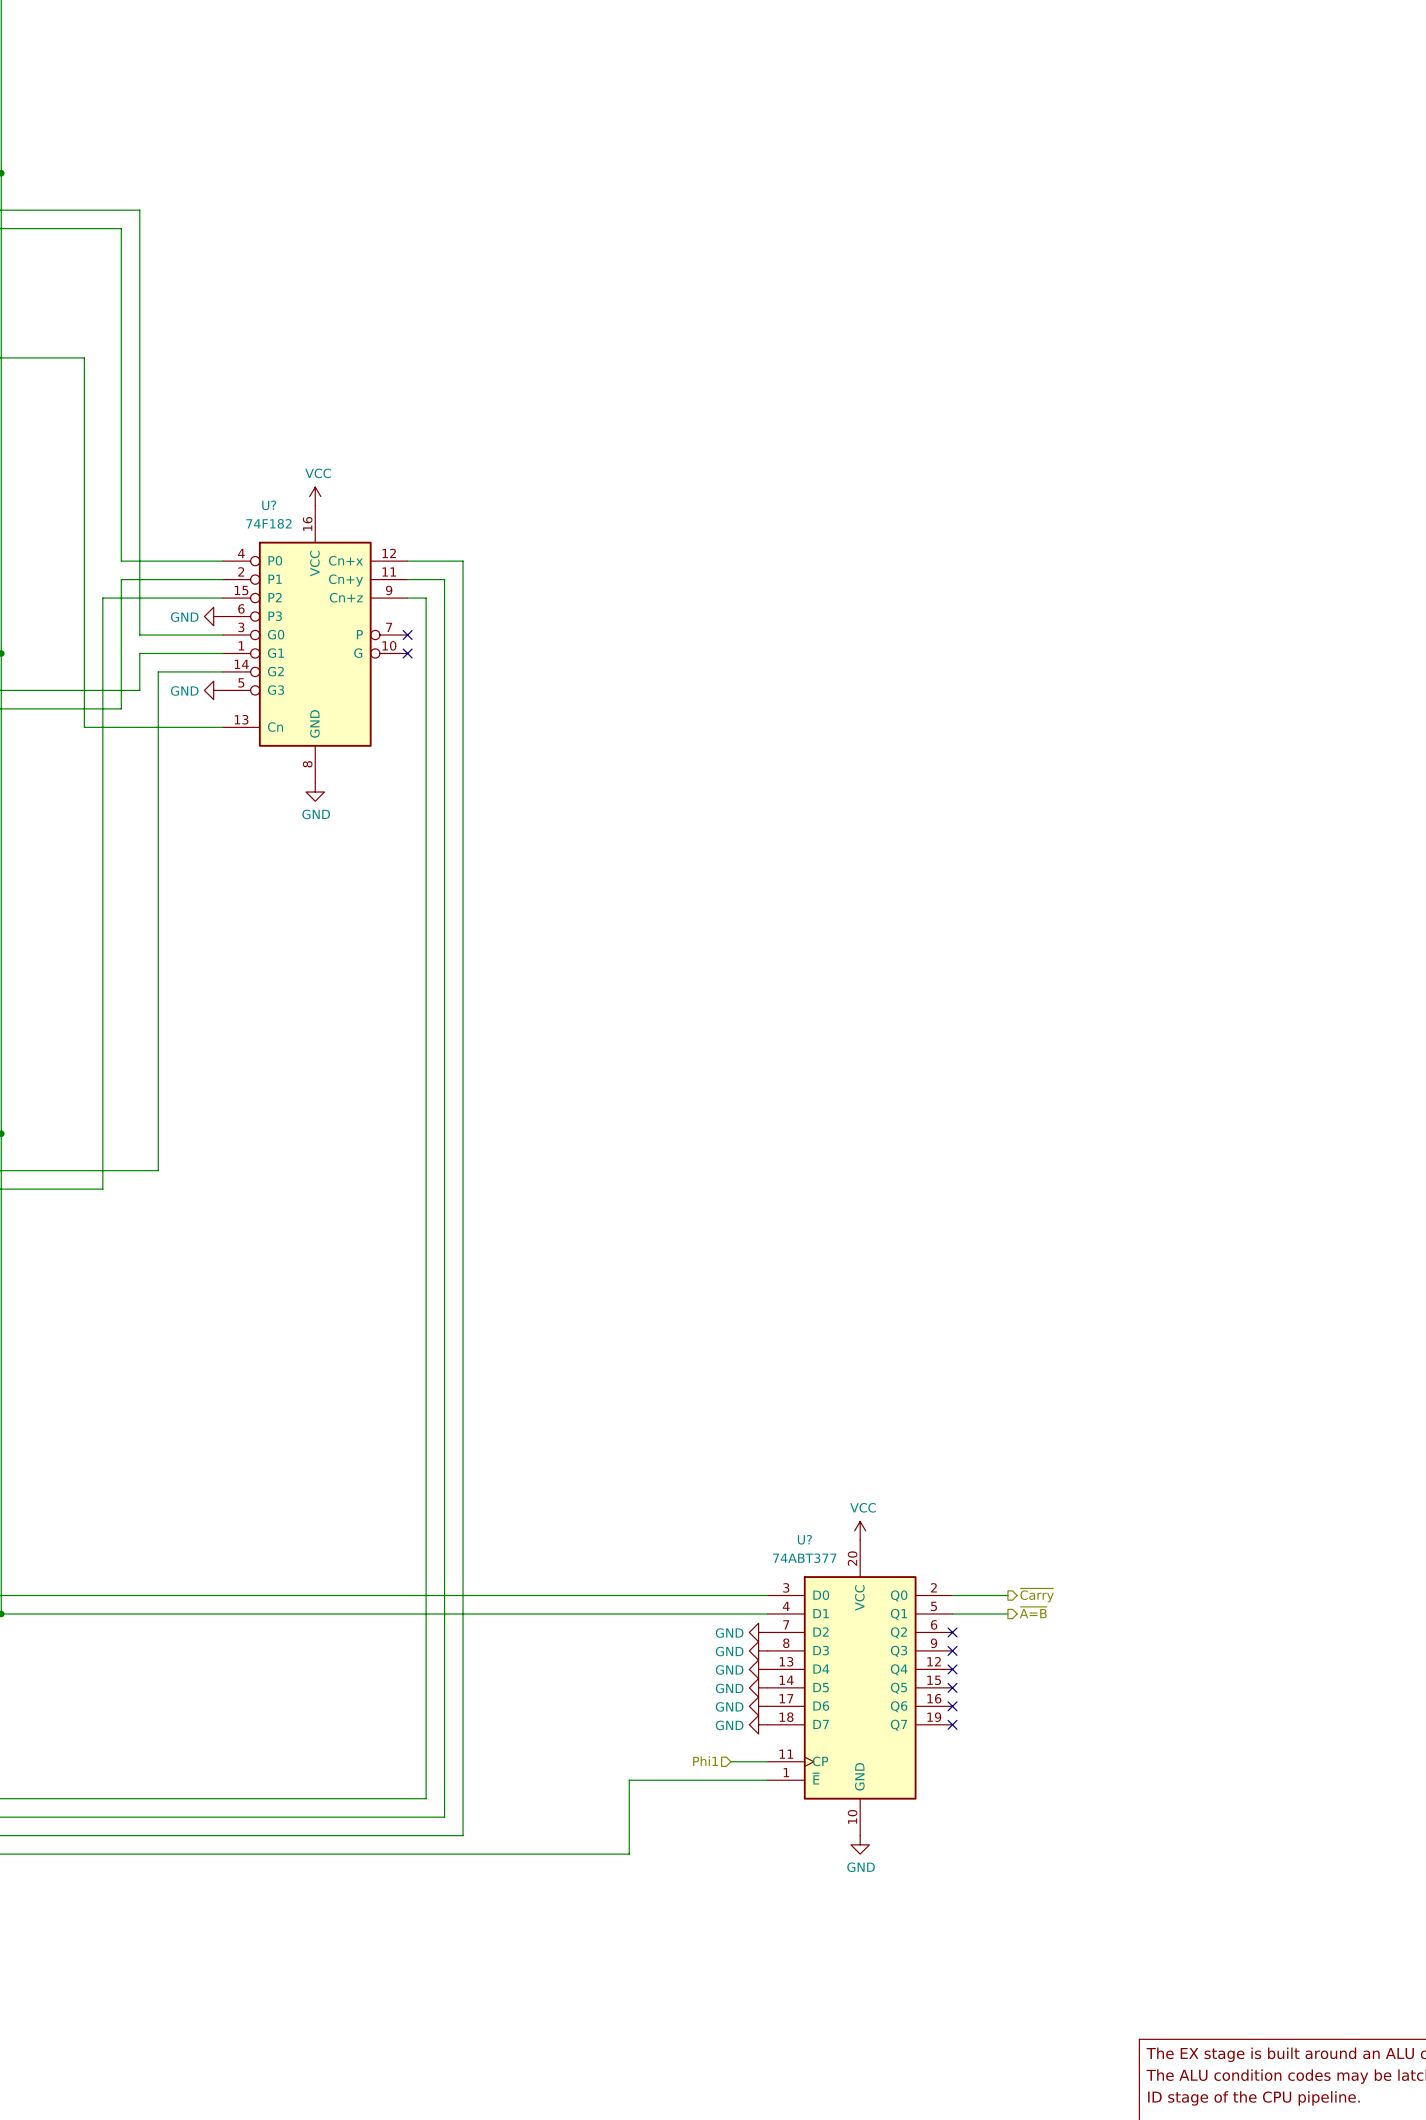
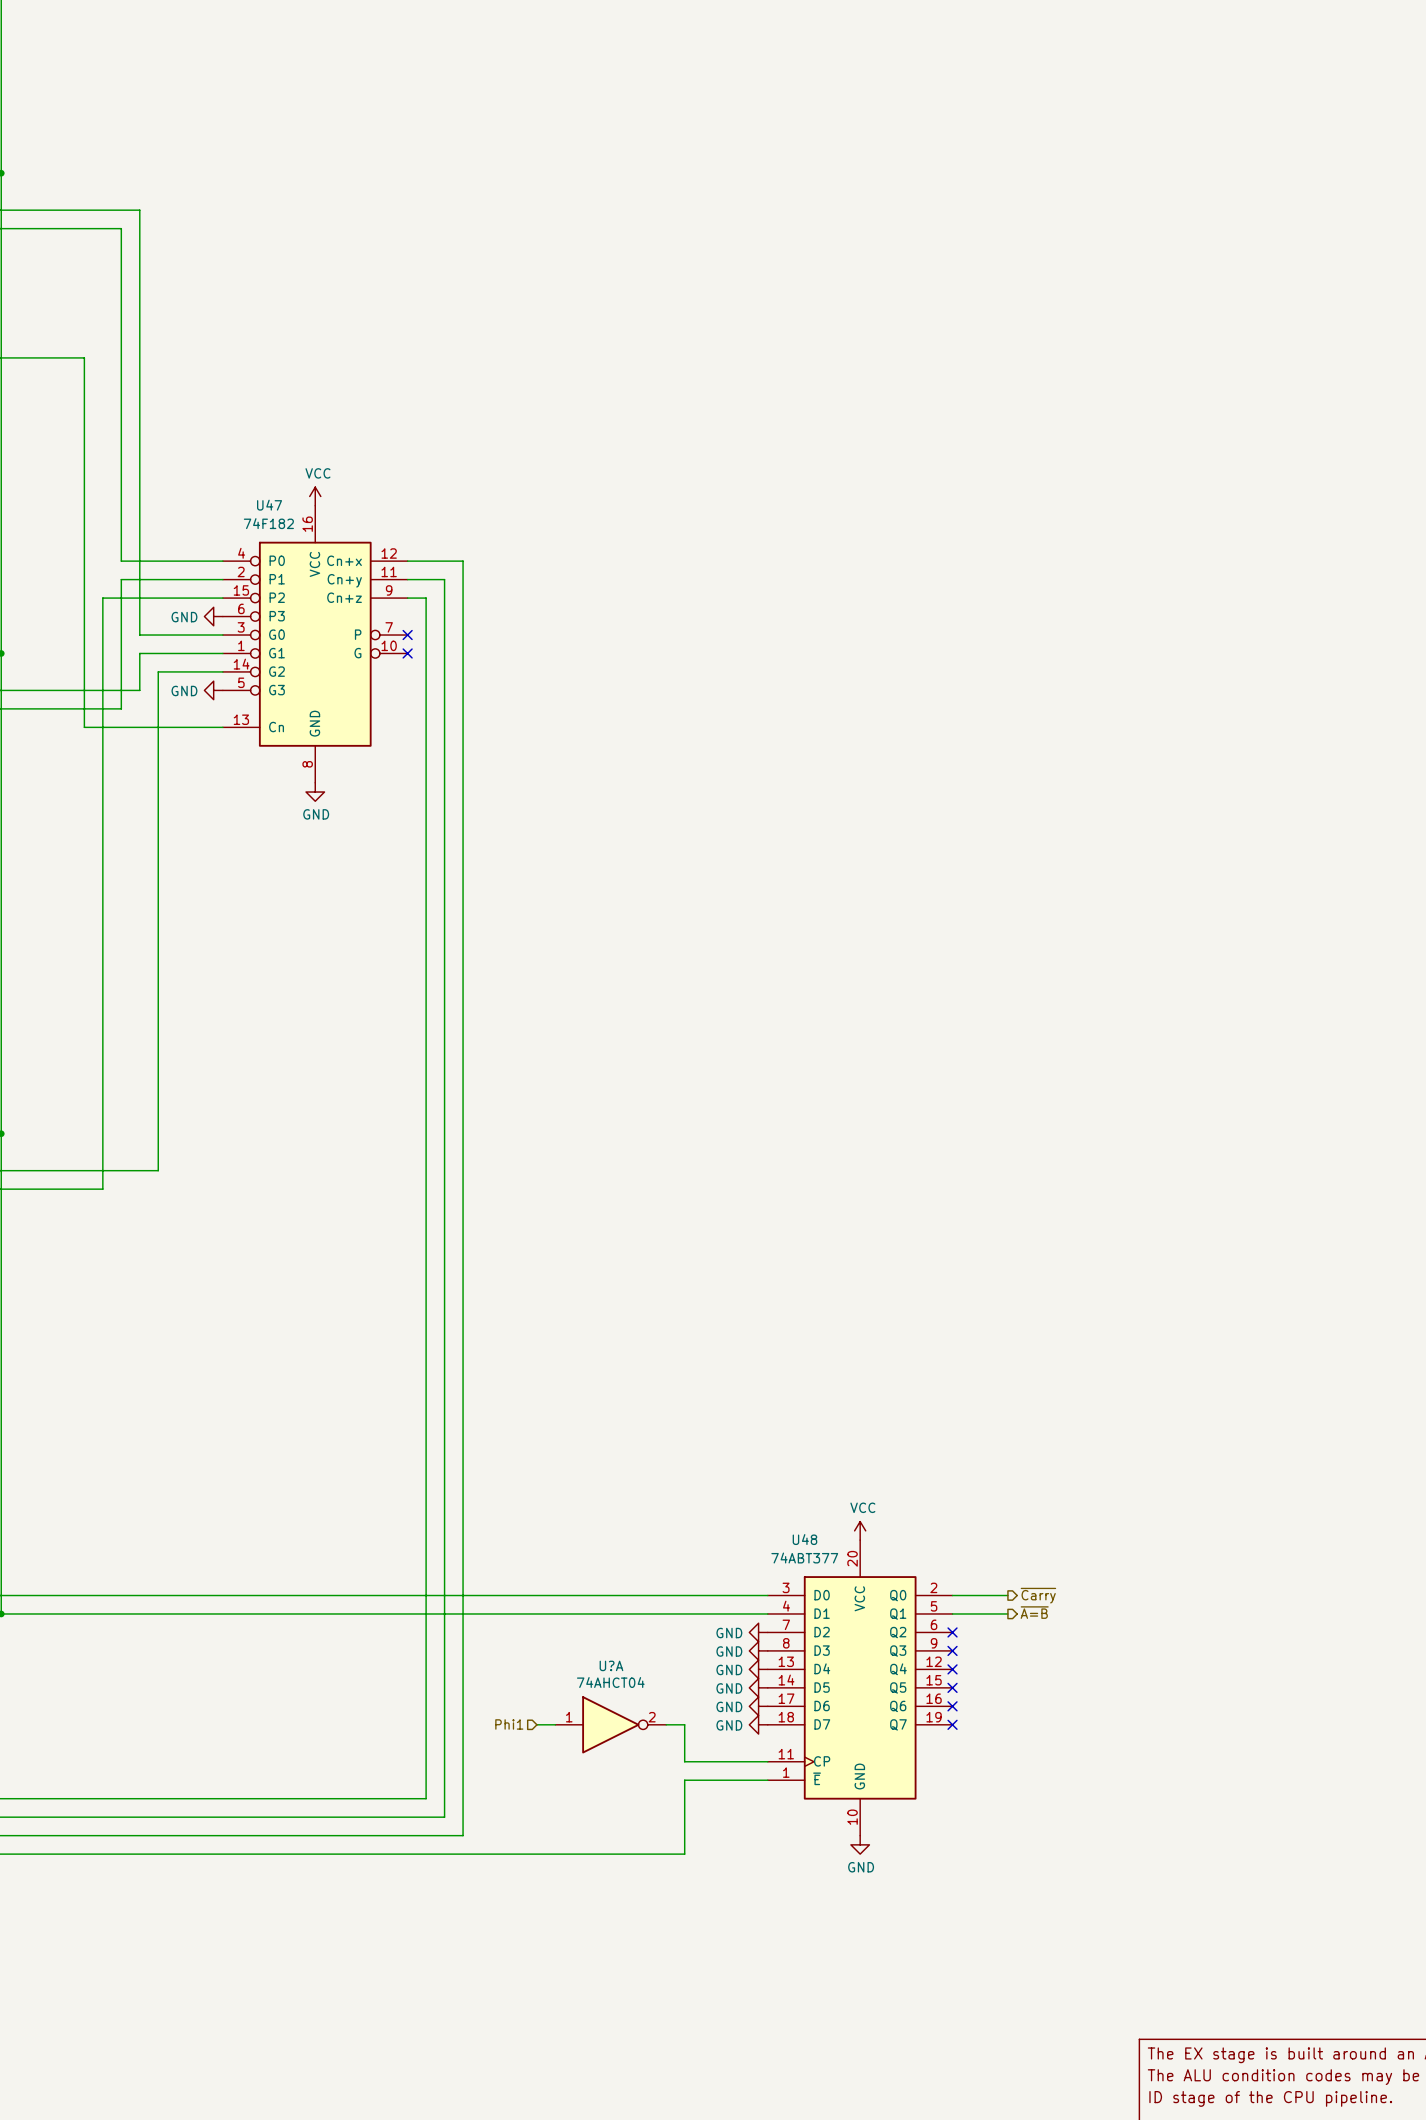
U? name: U? (269, 505) -> U47 (269, 505)
U? name: U? (804, 1539) -> U48 (804, 1539)
hierarchical label: none -> Phi1 (509, 1724)
wire: none -> (536, 1724) (555, 1724)
U?A: none -> 74AHCT04 (610, 1724)
wire: none -> (666, 1724) (684, 1724) (684, 1761) (730, 1761)
hierarchical label: Phi1 (705, 1761) -> none
wire: (684, 1780) (629, 1780) (629, 1854) -> (684, 1780) (684, 1854) (629, 1854)

